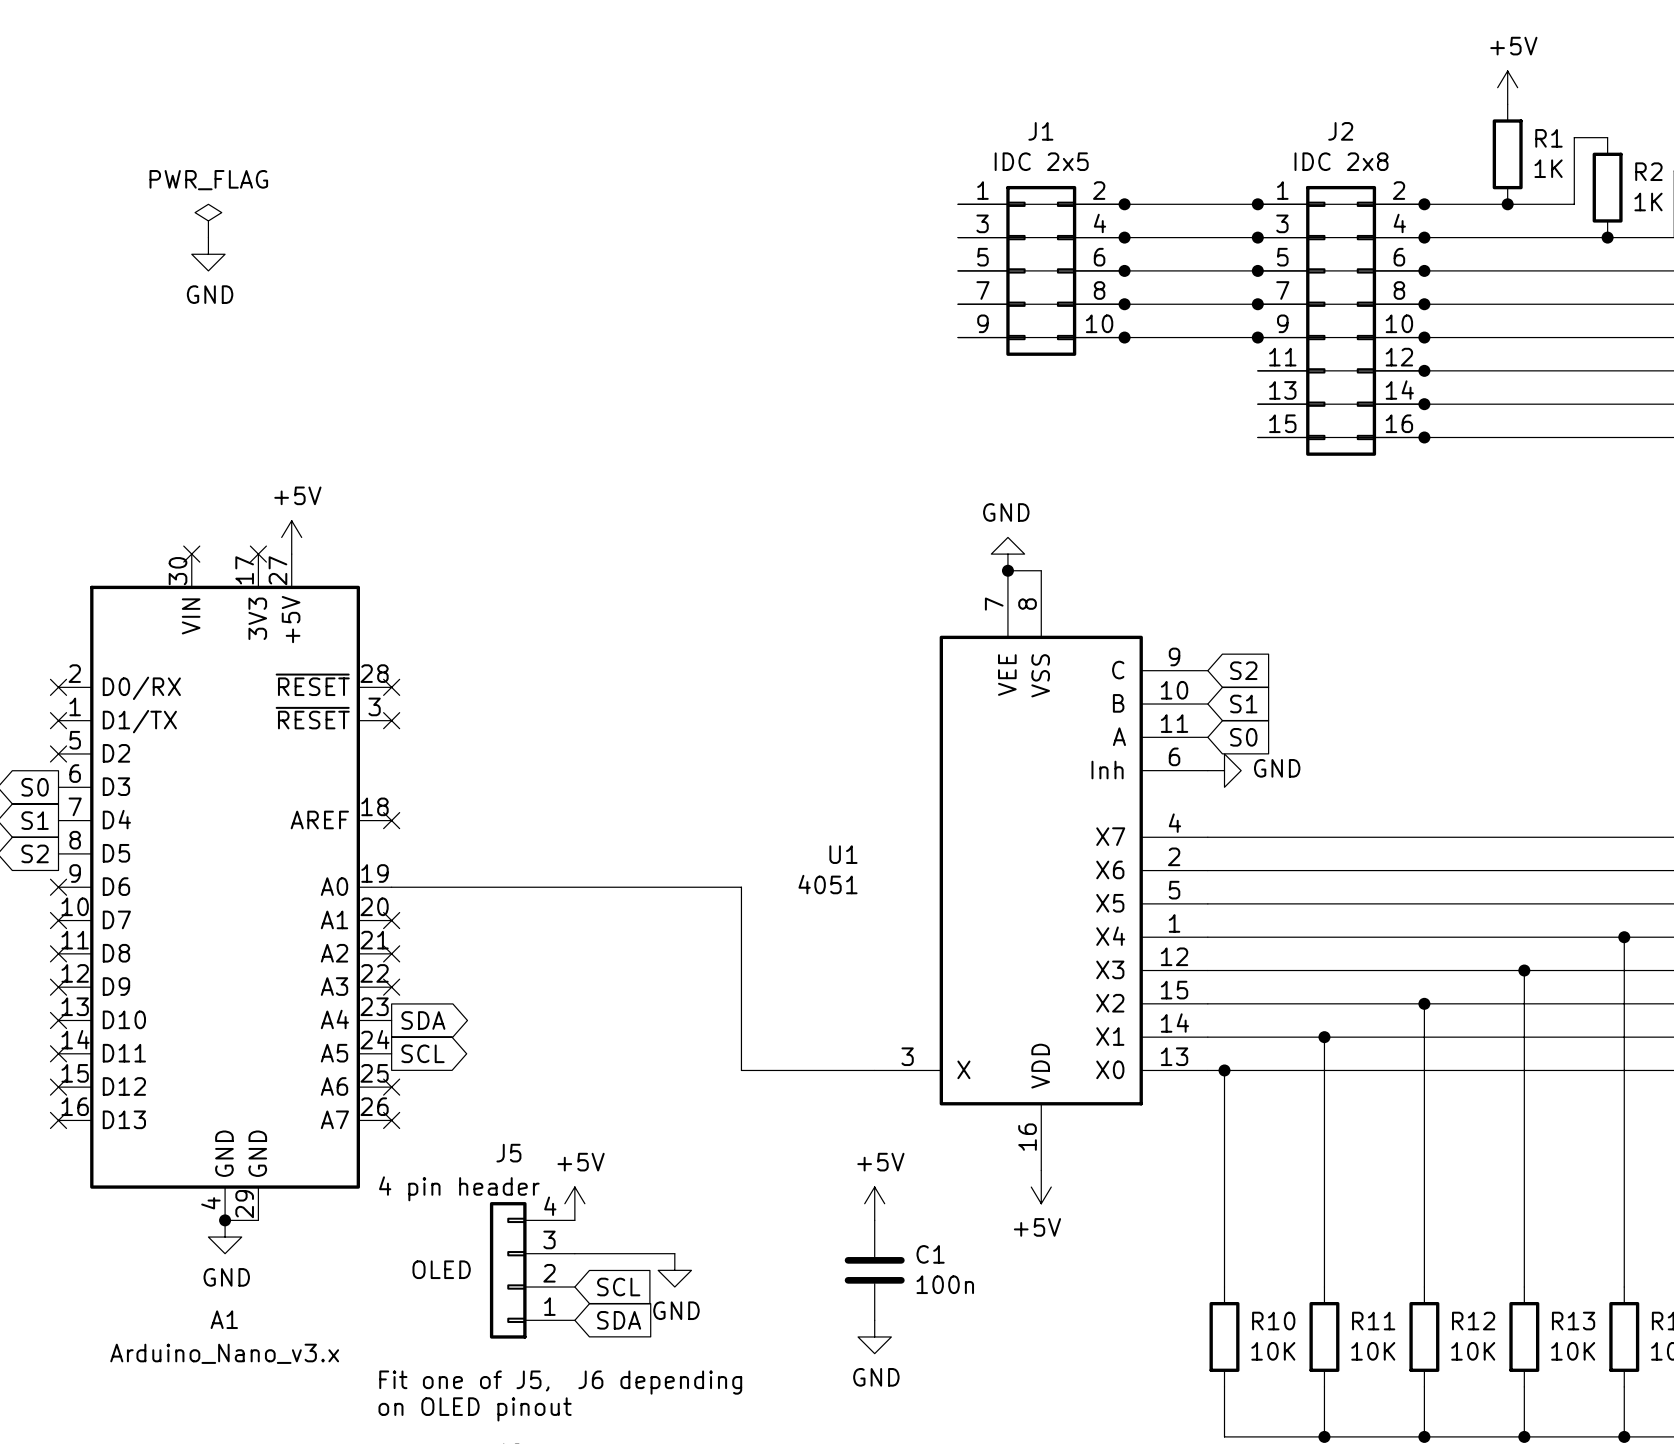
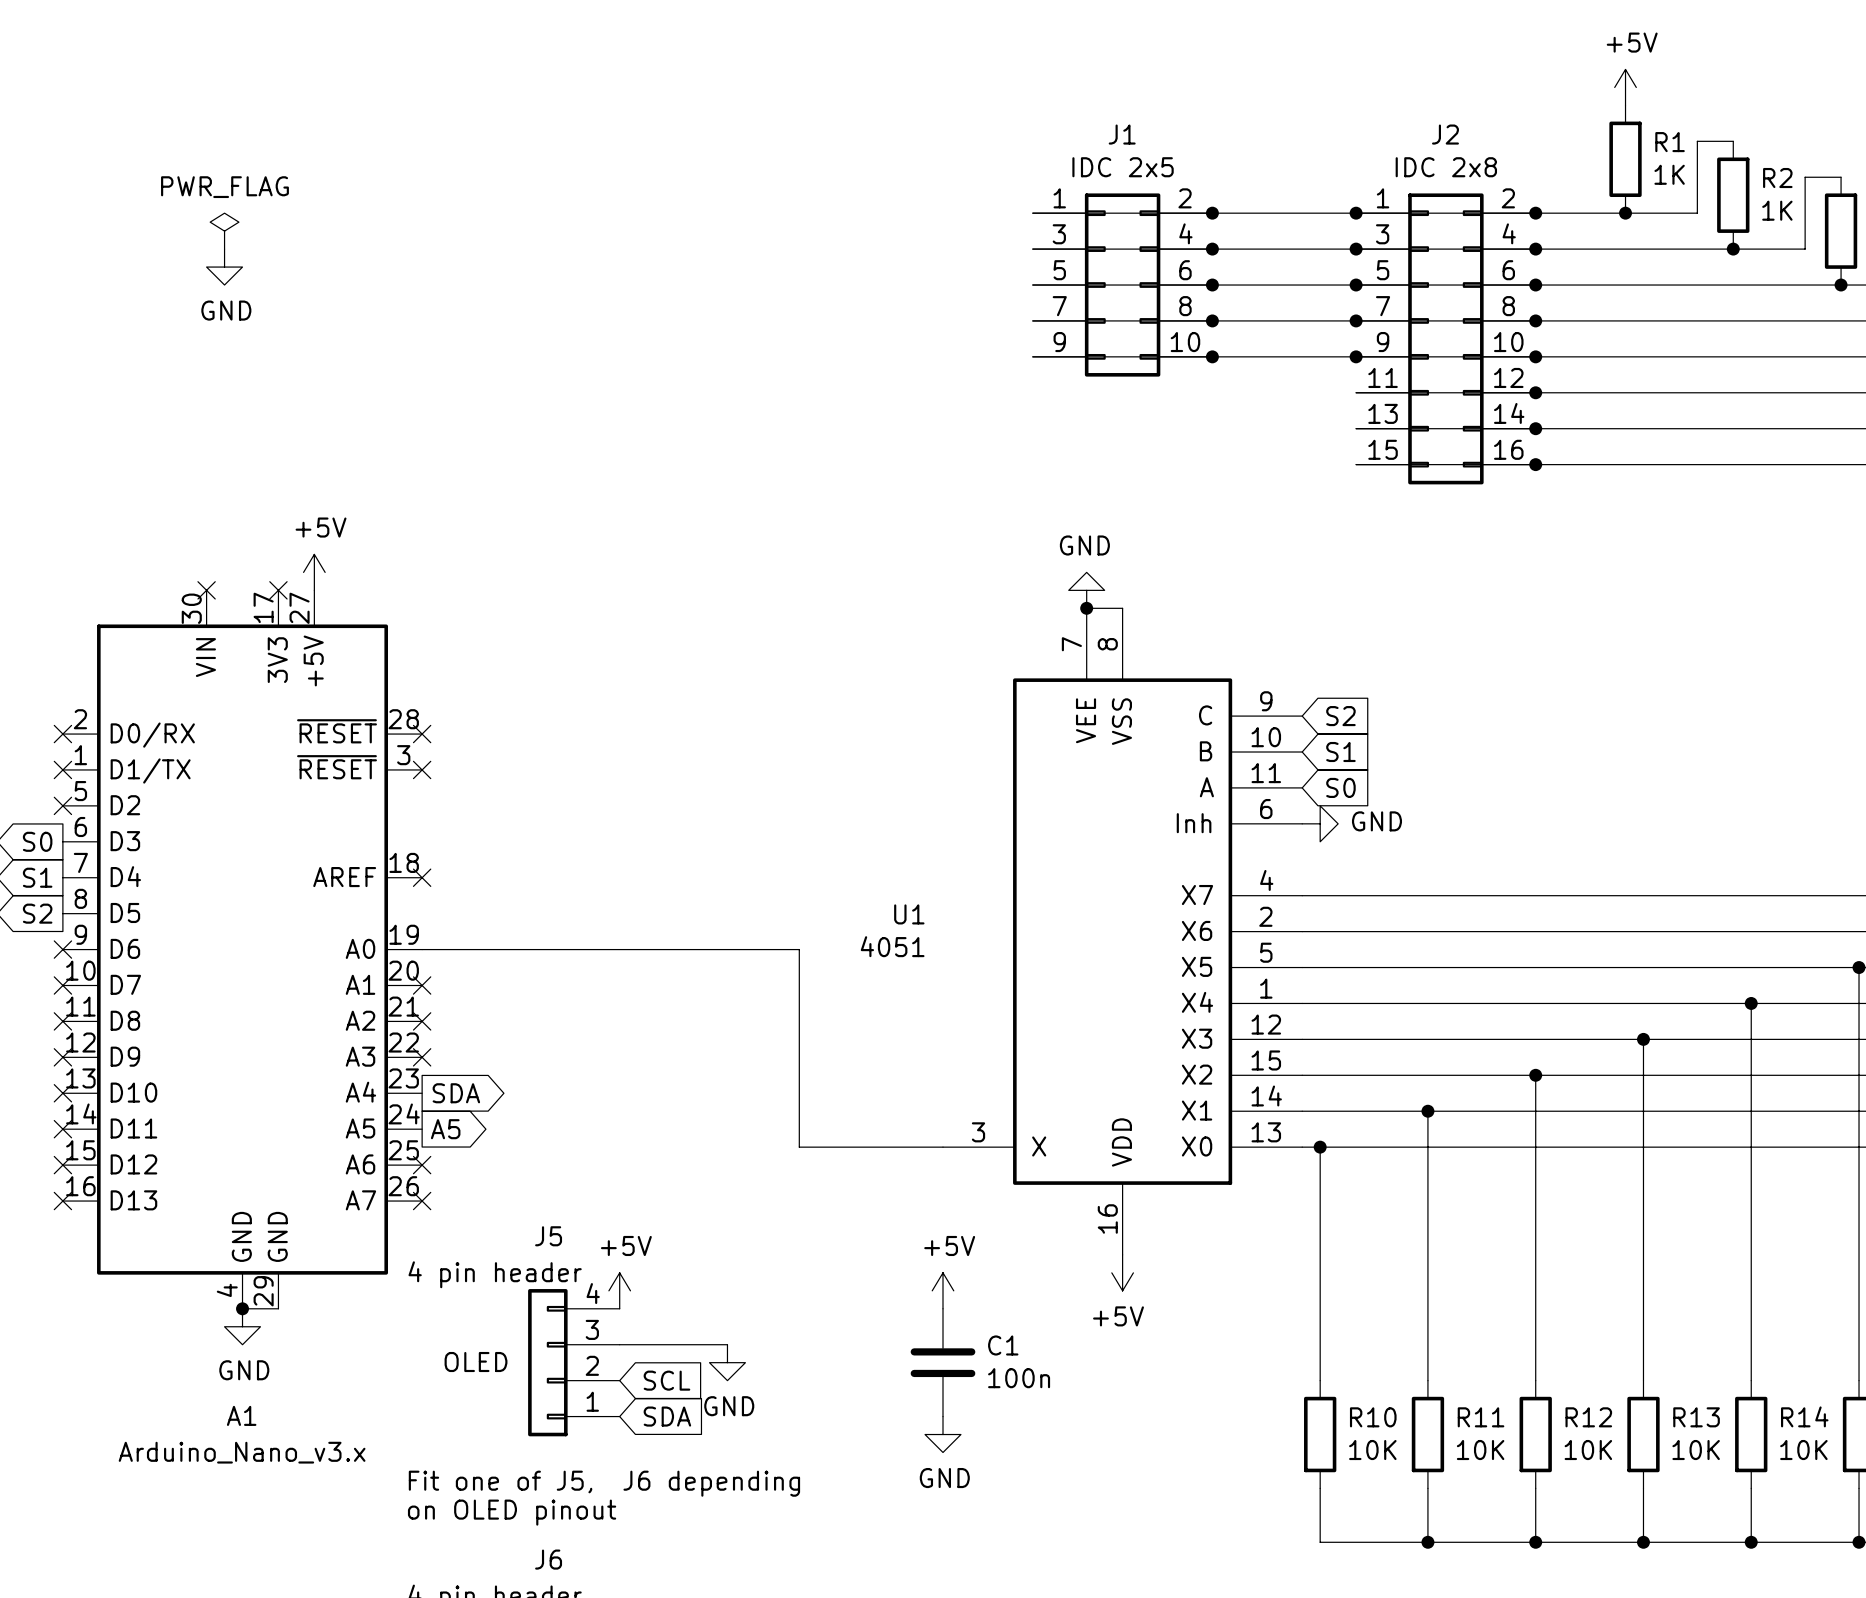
global label: SCL (423, 1053) -> A5 (445, 1129)

